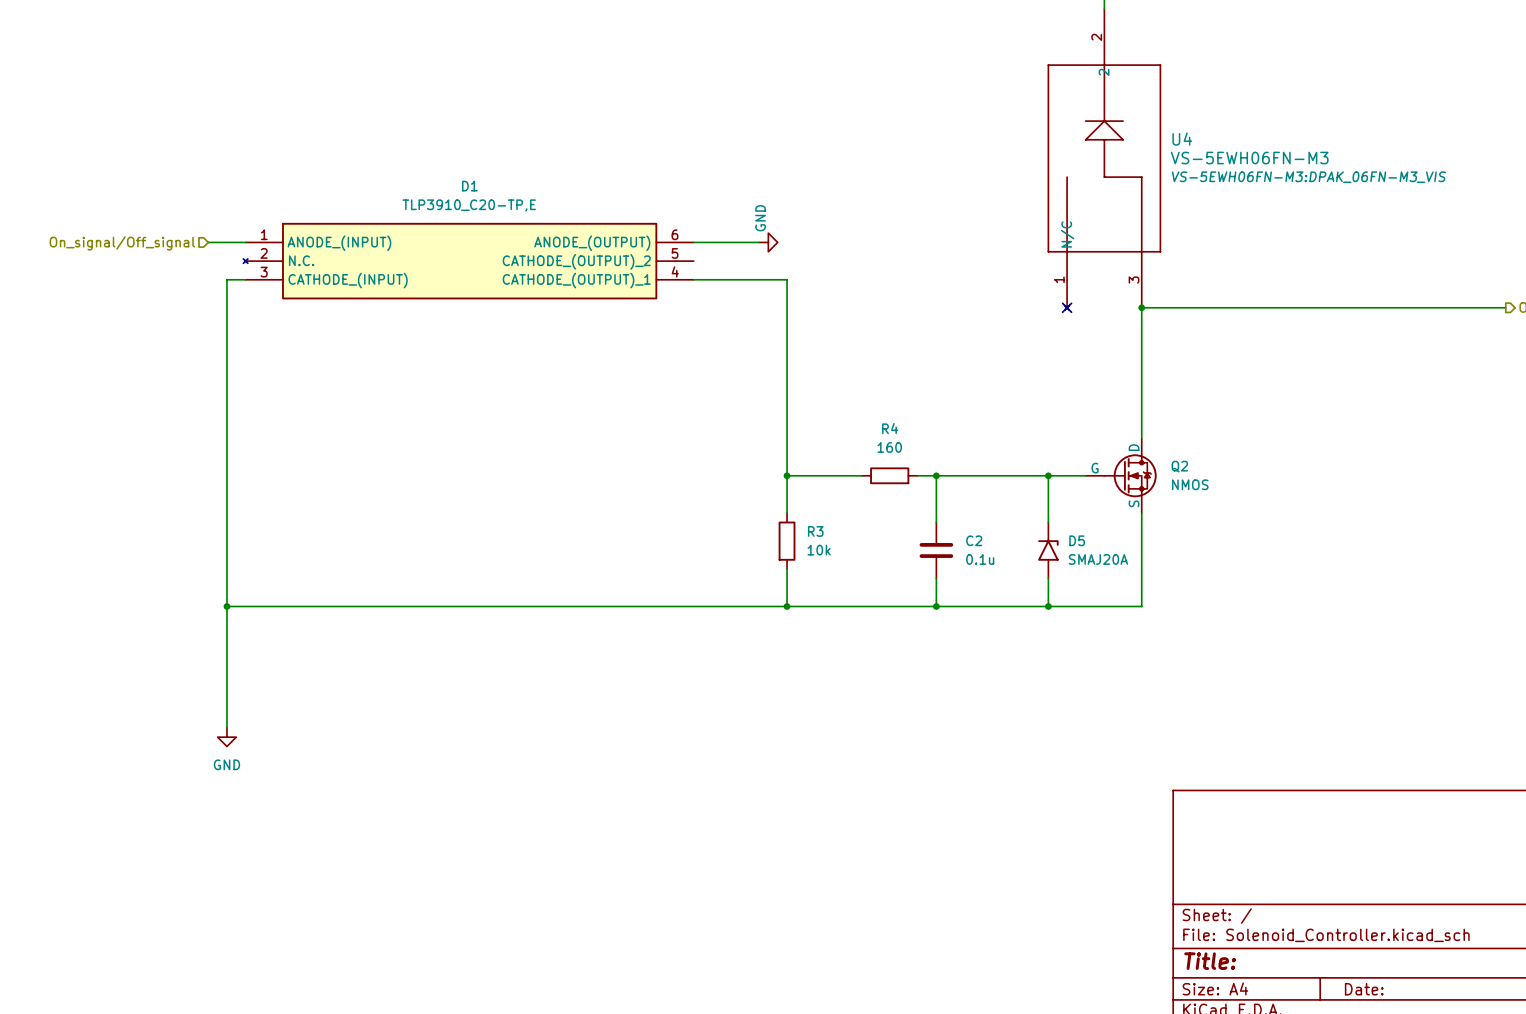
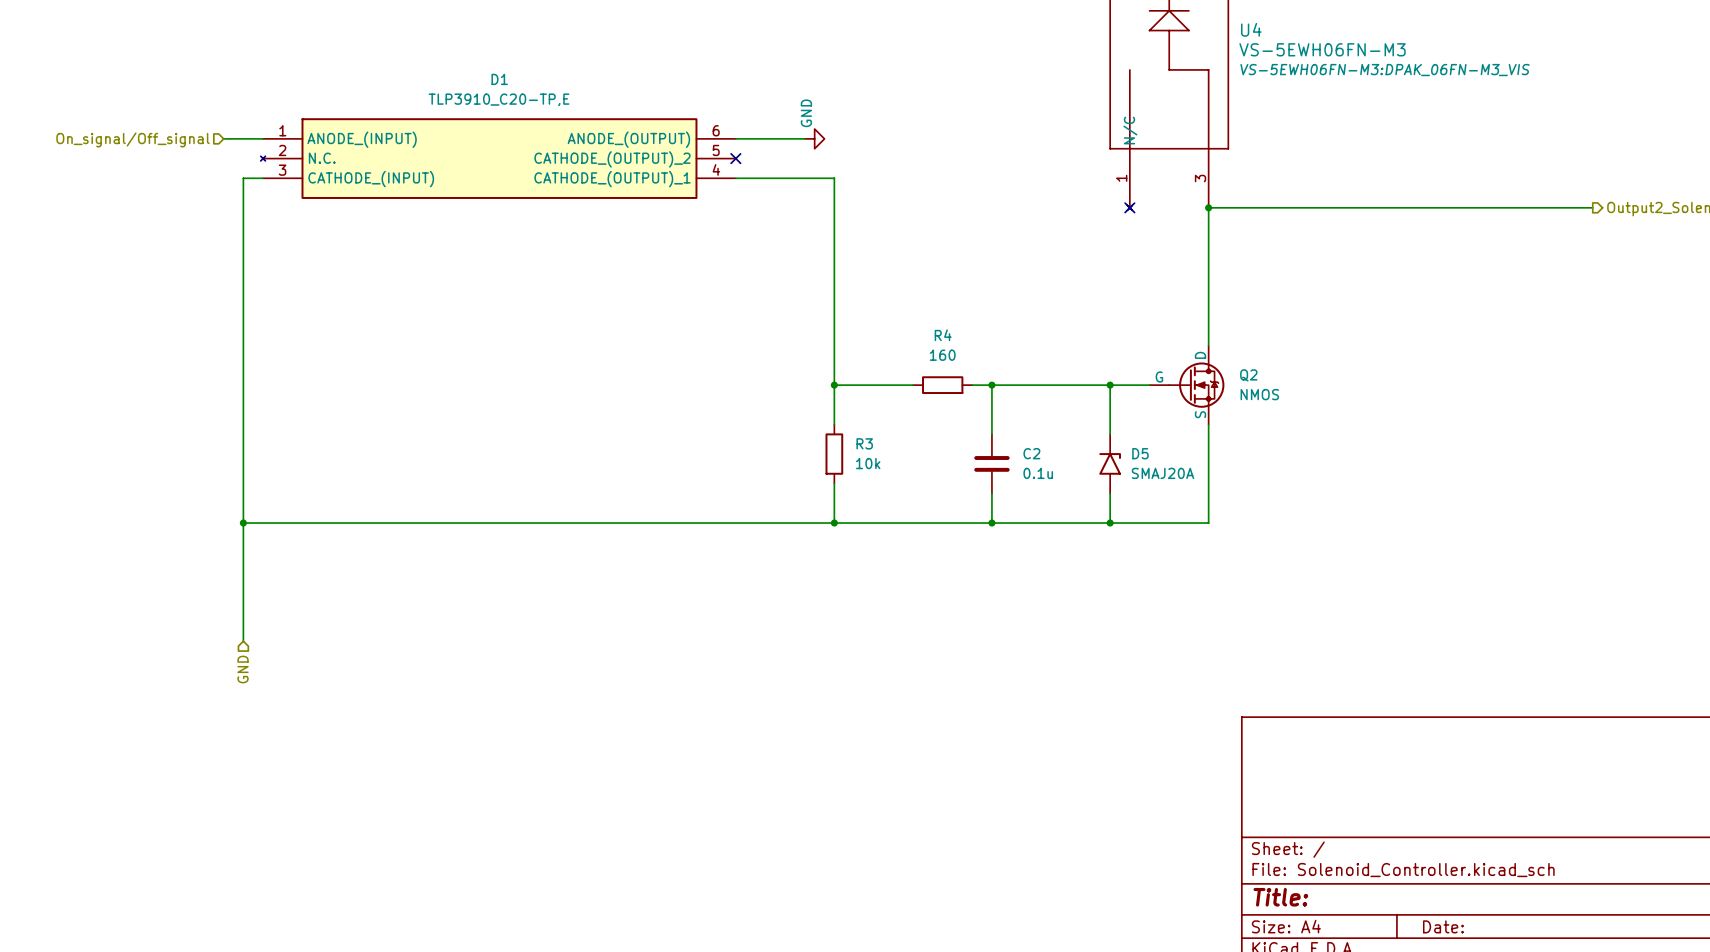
no-connect mark: none -> (735, 158)
wire: (226, 718) (226, 727) -> none
power symbol: GND (226, 737) -> none
hierarchical label: none -> GND (243, 669)

